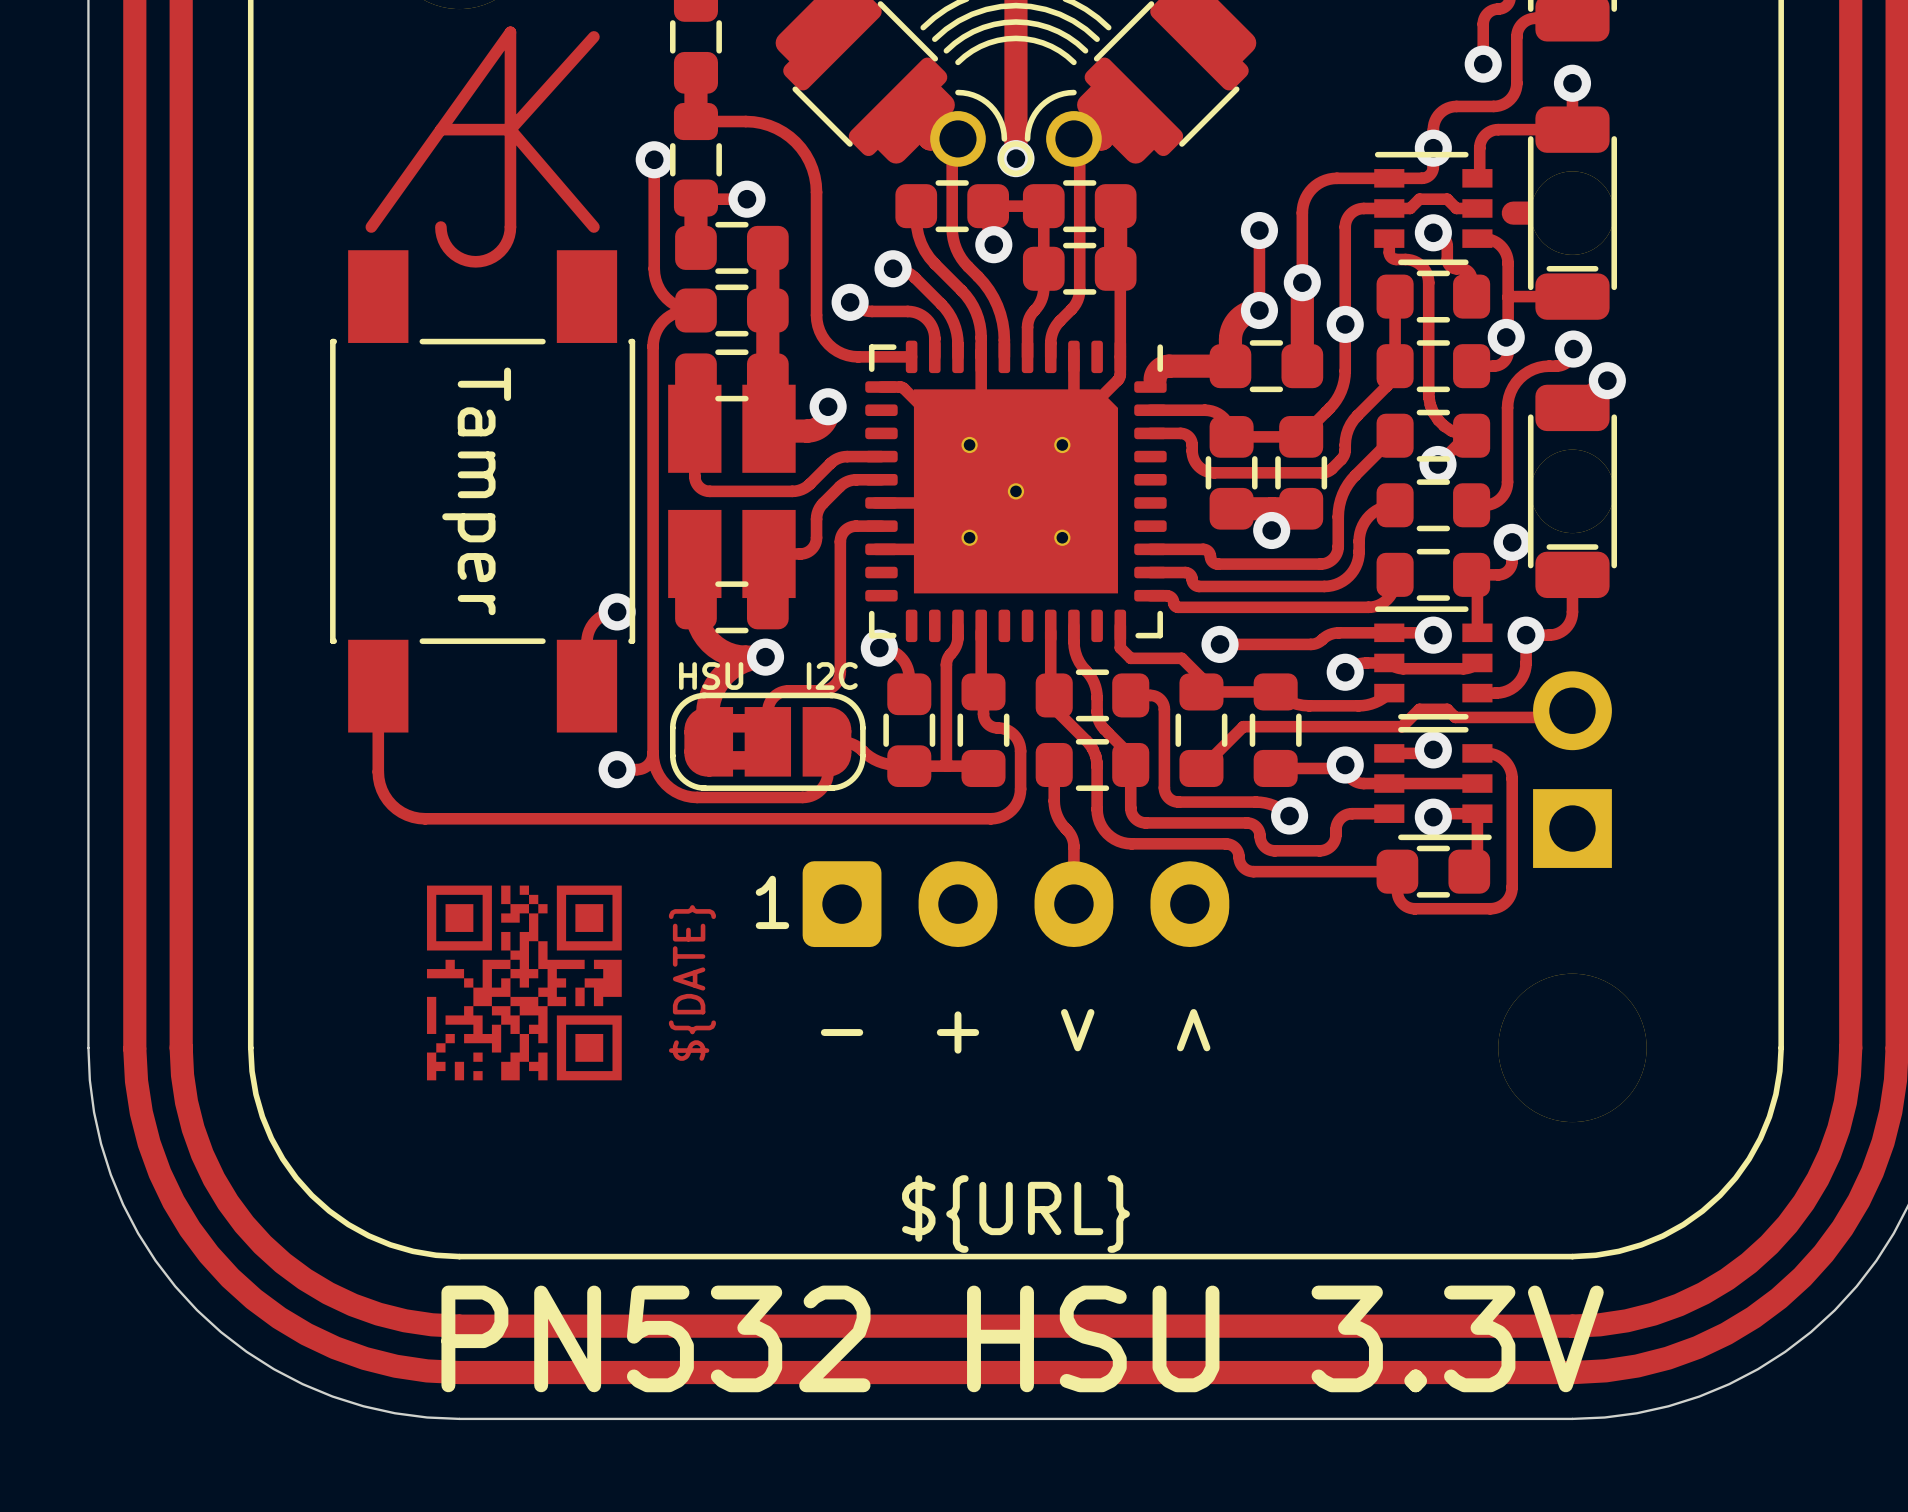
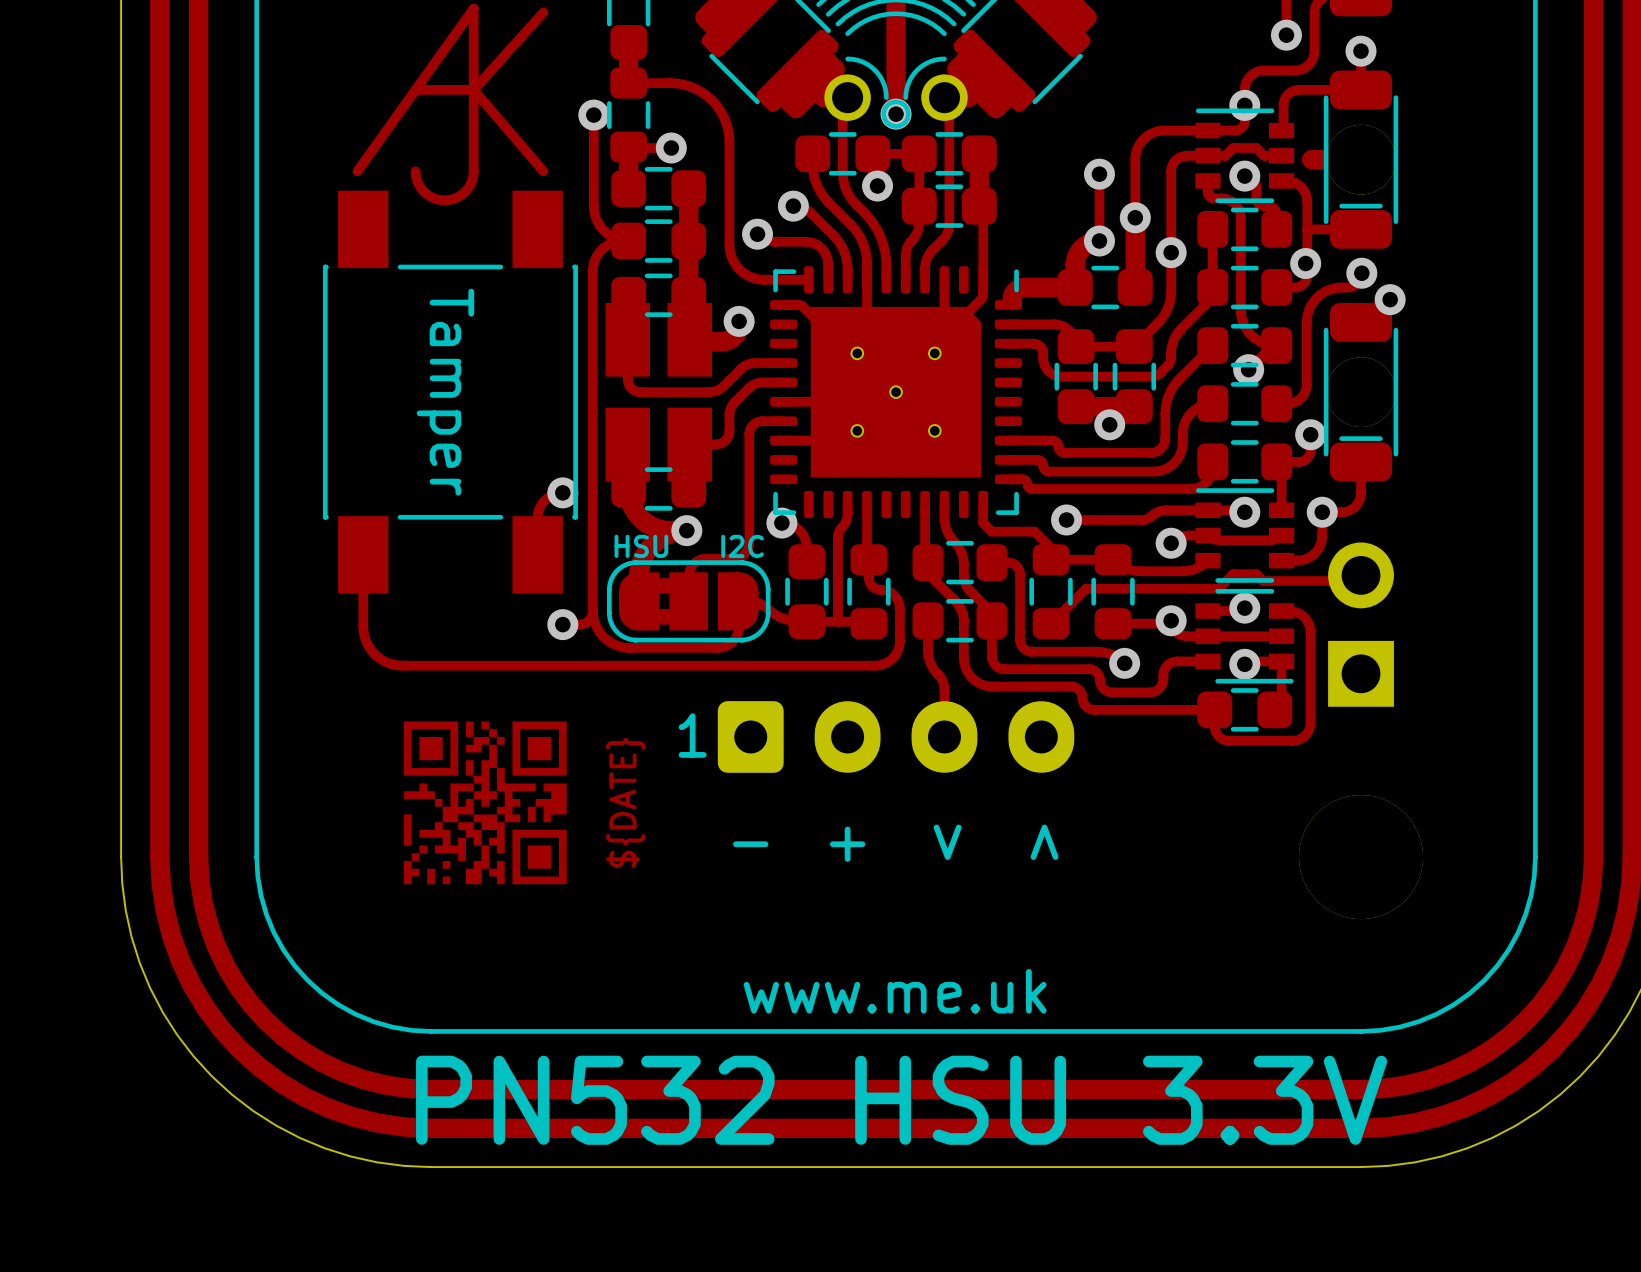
text: ${URL} (1015, 1214) -> www.me.uk (895, 991)

